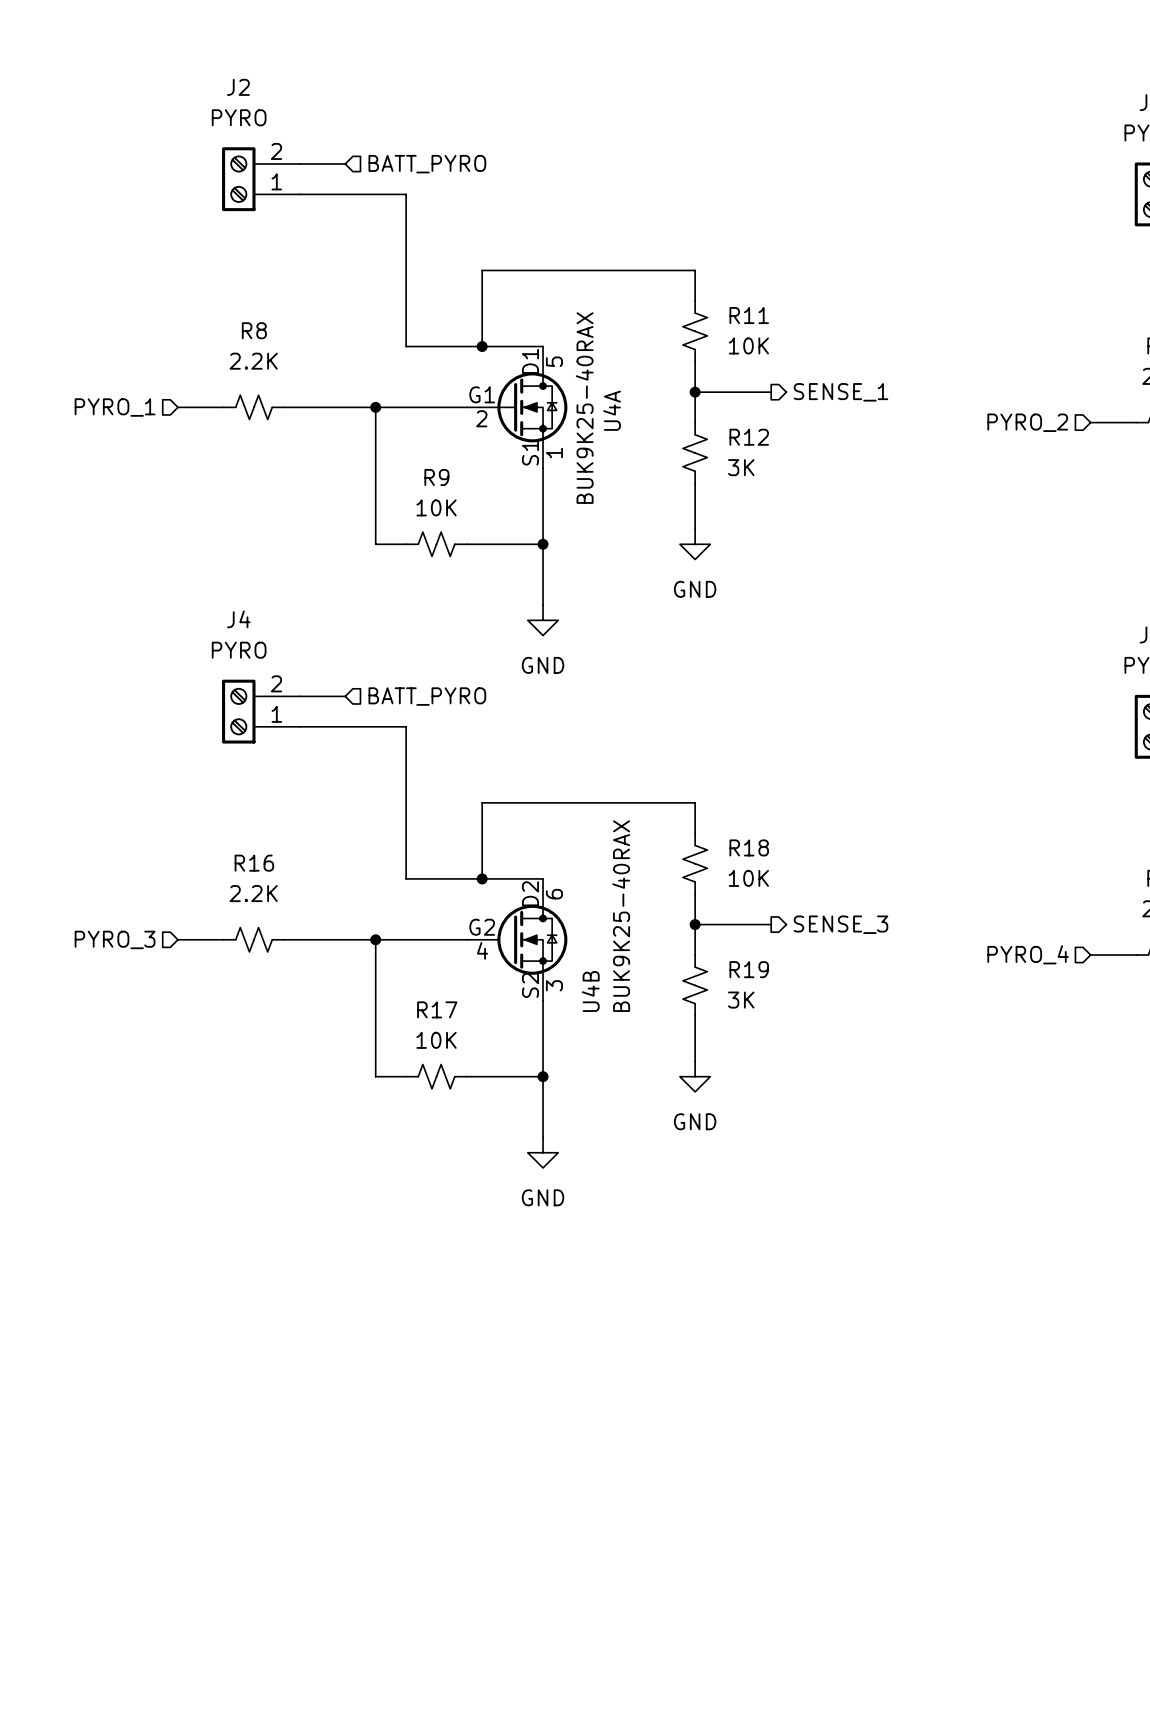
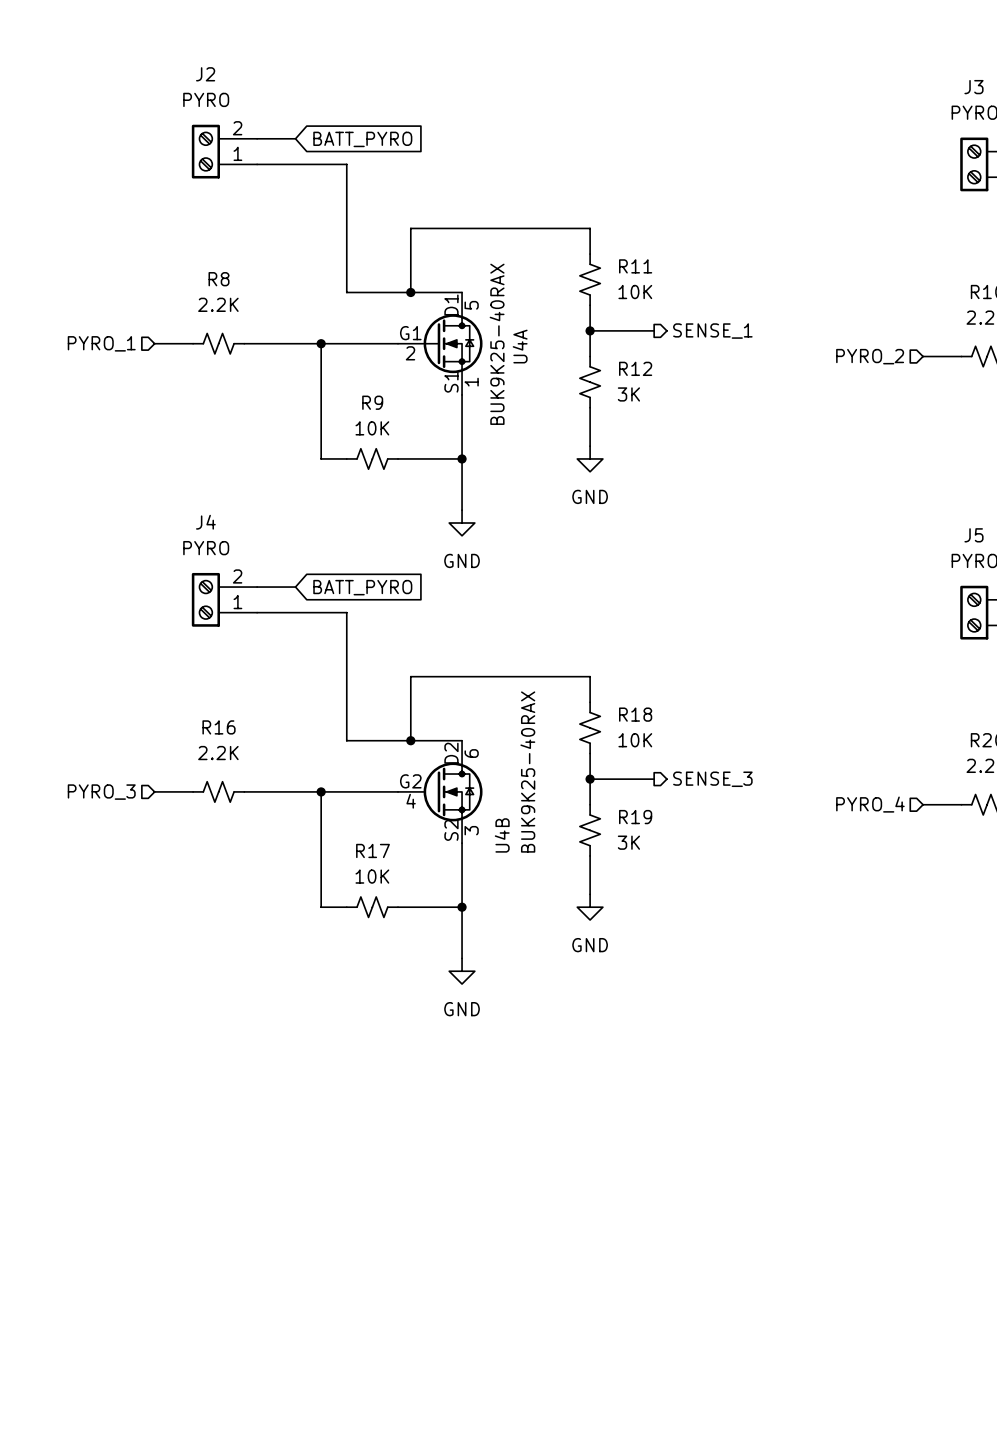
global label: none -> BATT_PYRO (362, 139)
hierarchical label: BATT_PYRO (427, 164) -> none
hierarchical label: BATT_PYRO (427, 696) -> none
global label: none -> BATT_PYRO (362, 587)

